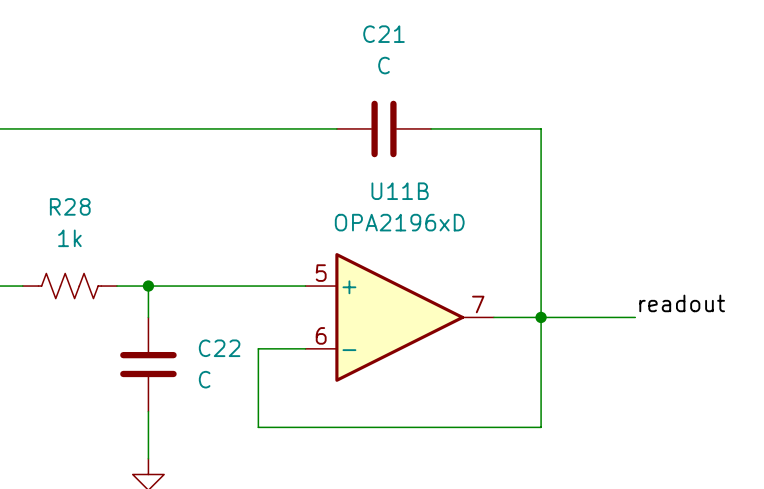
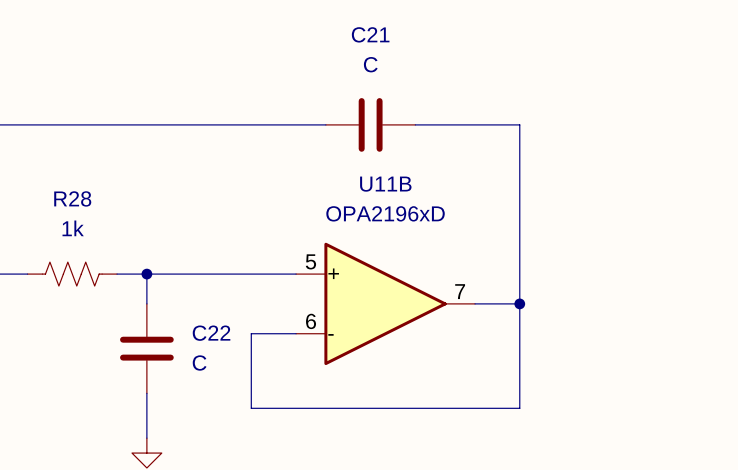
label: readout (682, 303) -> none
wire: (541, 317) (635, 317) -> none

